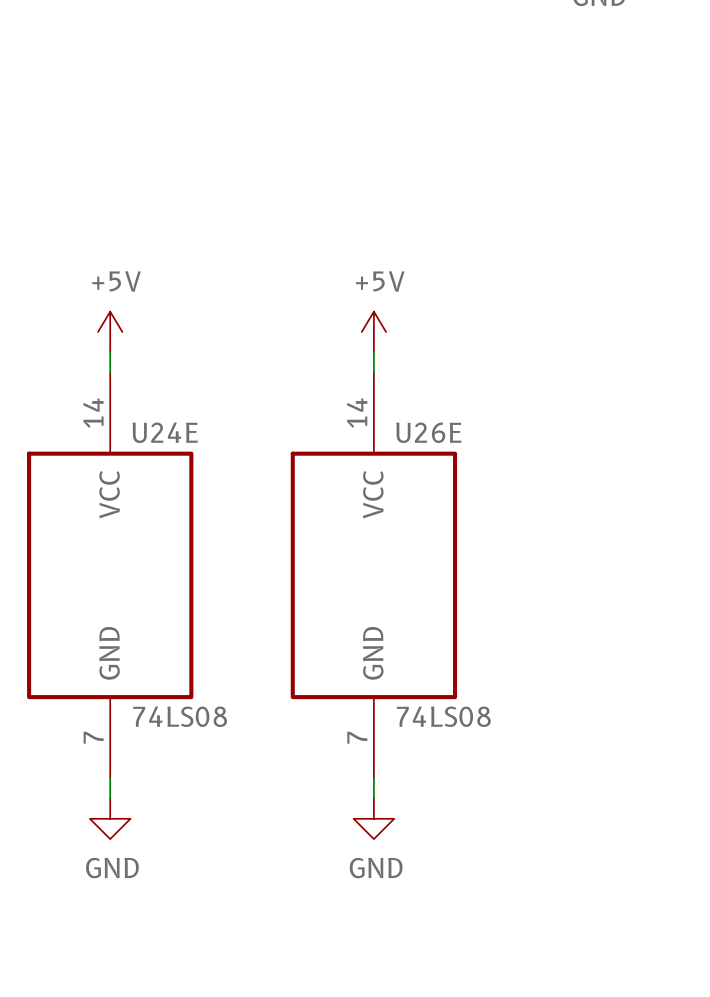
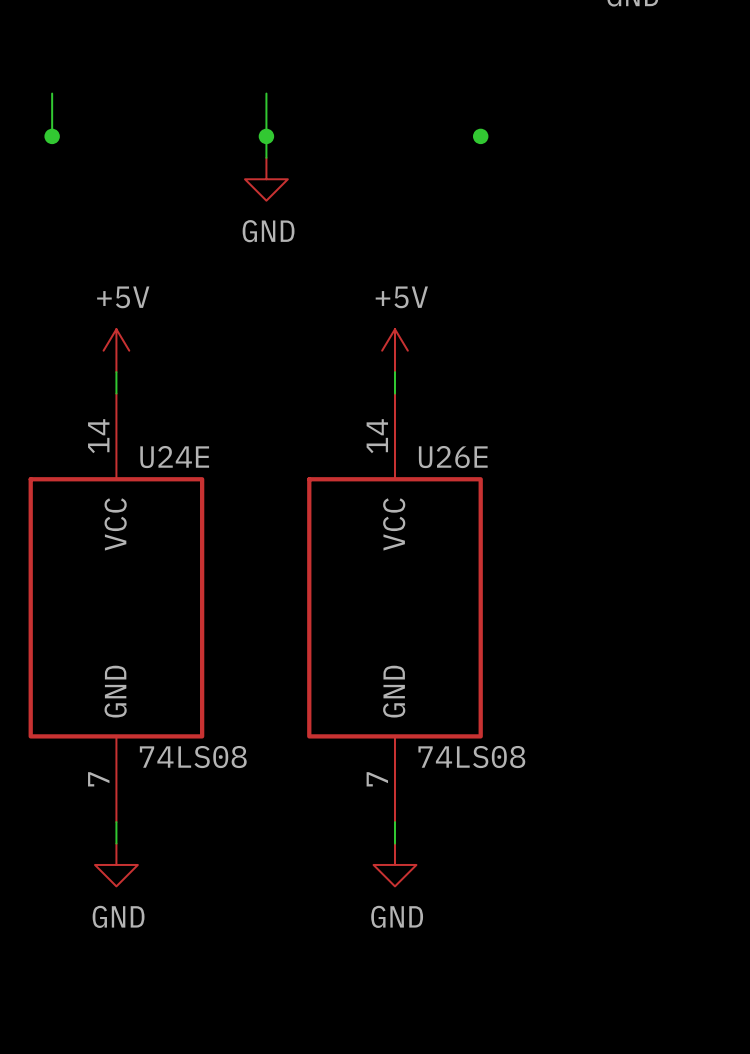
wire: none -> (52, 93) (52, 136)
wire: none -> (266, 93) (266, 157)
junction: none -> (52, 136)
junction: none -> (266, 136)
junction: none -> (480, 136)
power symbol: none -> GND (266, 179)

